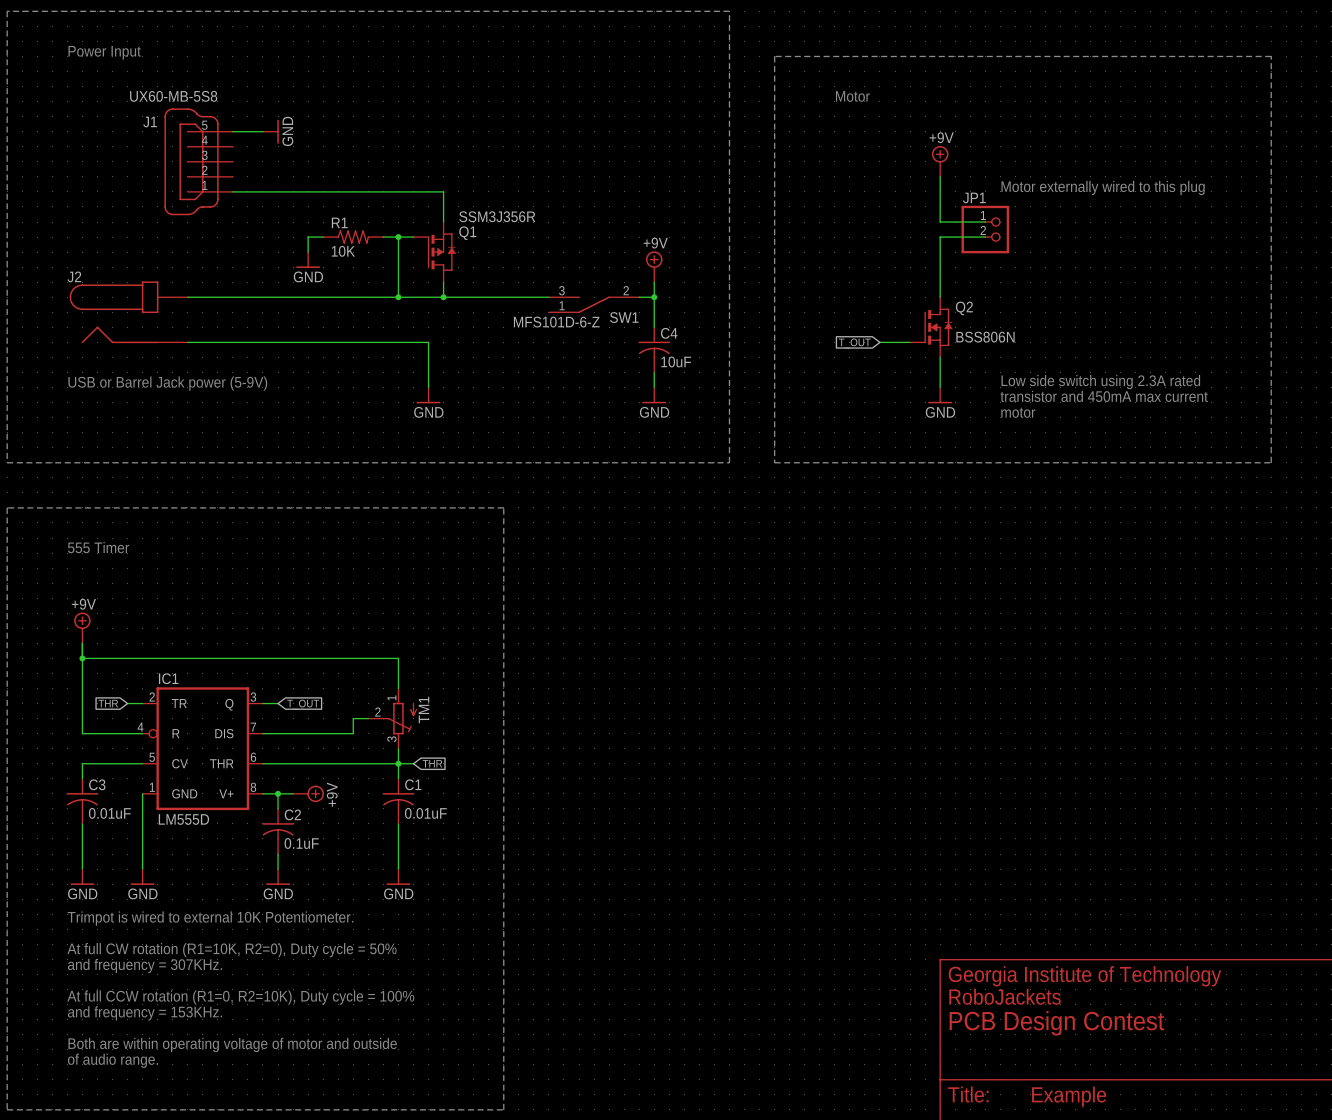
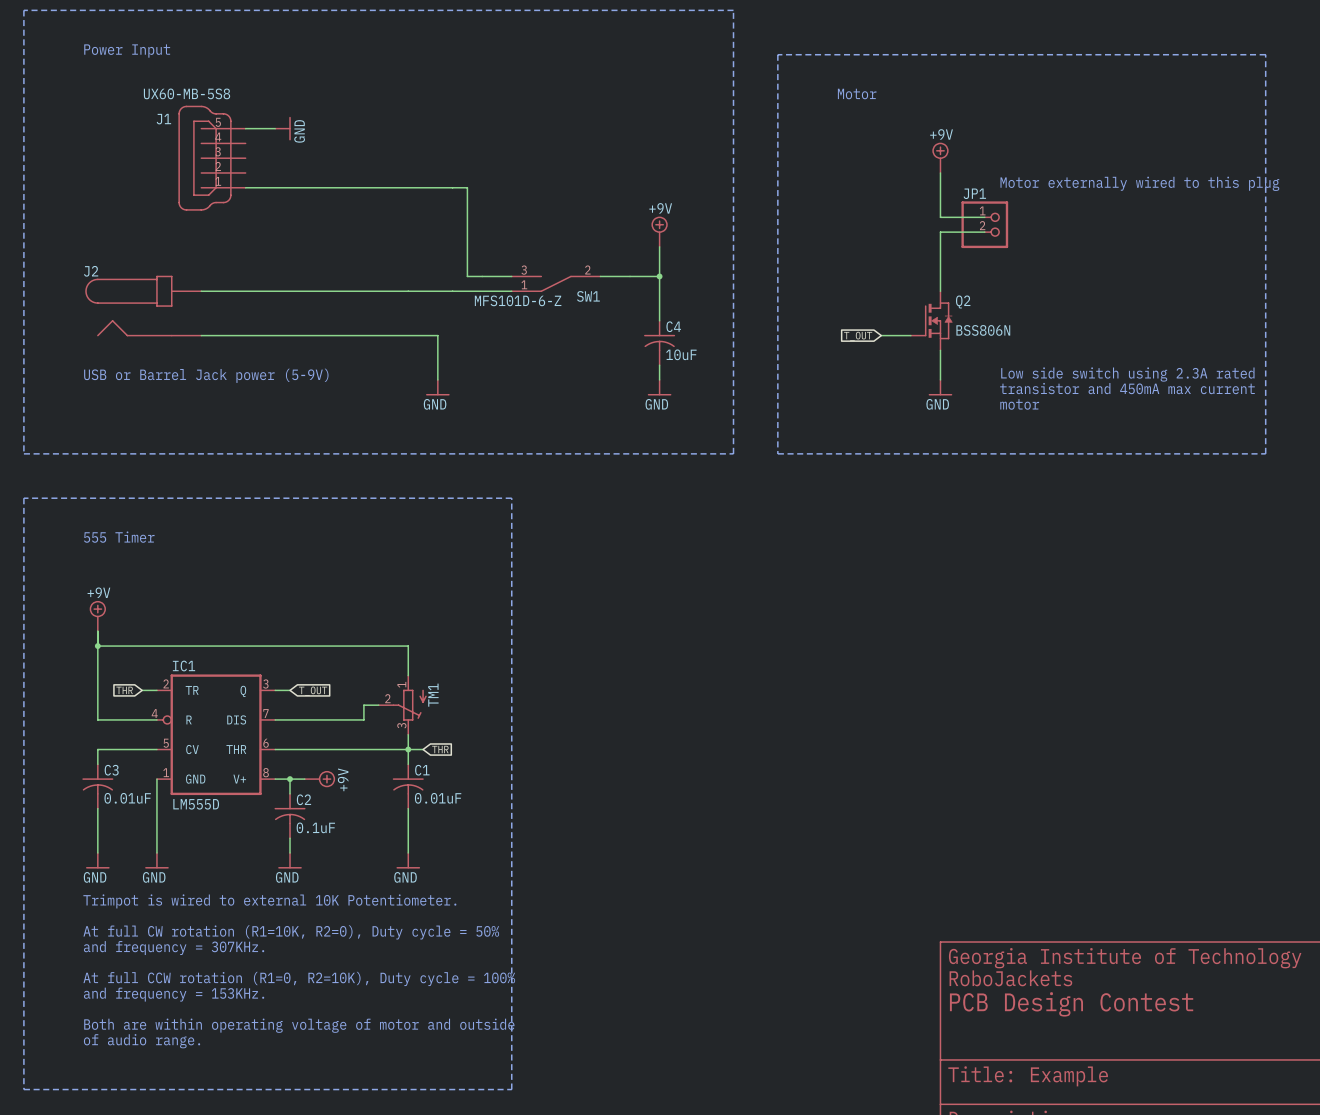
wire: (443, 191) (443, 222) -> (452, 187) (467, 187) (467, 276) (511, 276)
wire: (323, 237) (308, 237) (308, 252) -> none
R1: 10K (353, 237) -> none
wire: (383, 237) (413, 237) -> none
wire: (398, 237) (398, 297) -> none
junction: (398, 237) -> none
Q1: SSM3J356R (434, 252) -> none
wire: none -> (659, 246) (659, 276) (600, 276)
power symbol: GND (308, 260) -> none
power symbol position: +9V (654, 266) -> +9V (659, 231)
wire: (443, 282) (443, 297) -> none
junction: (398, 297) -> none
junction: (443, 297) -> none
wire: (639, 297) (654, 297) -> none
junction position: (654, 297) -> (659, 276)
SW1 position: (594, 304) -> (556, 283)

